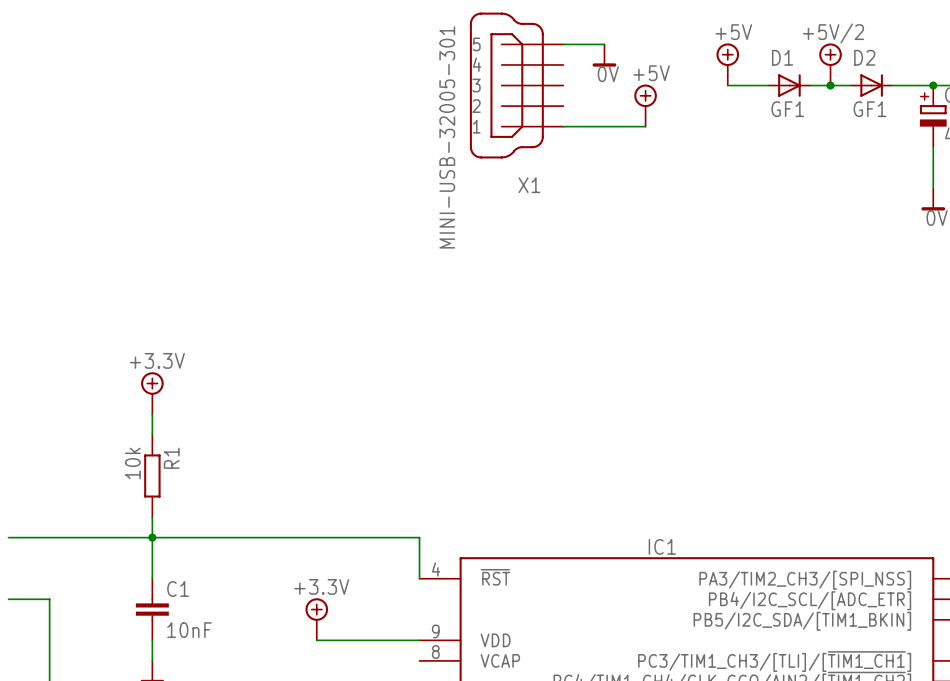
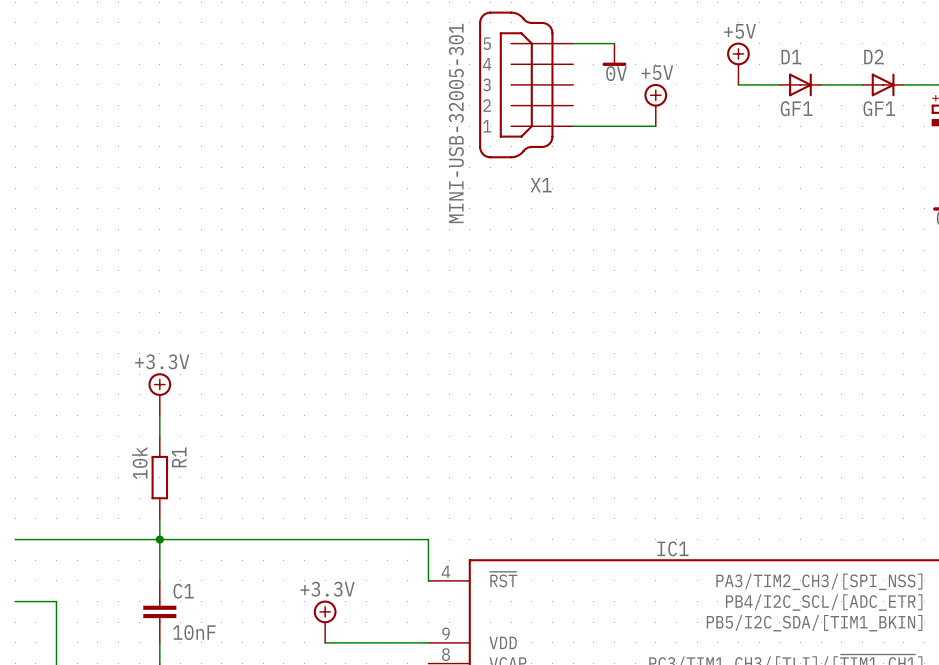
power symbol: +5V/2 (830, 64) -> none
junction: (830, 85) -> none

